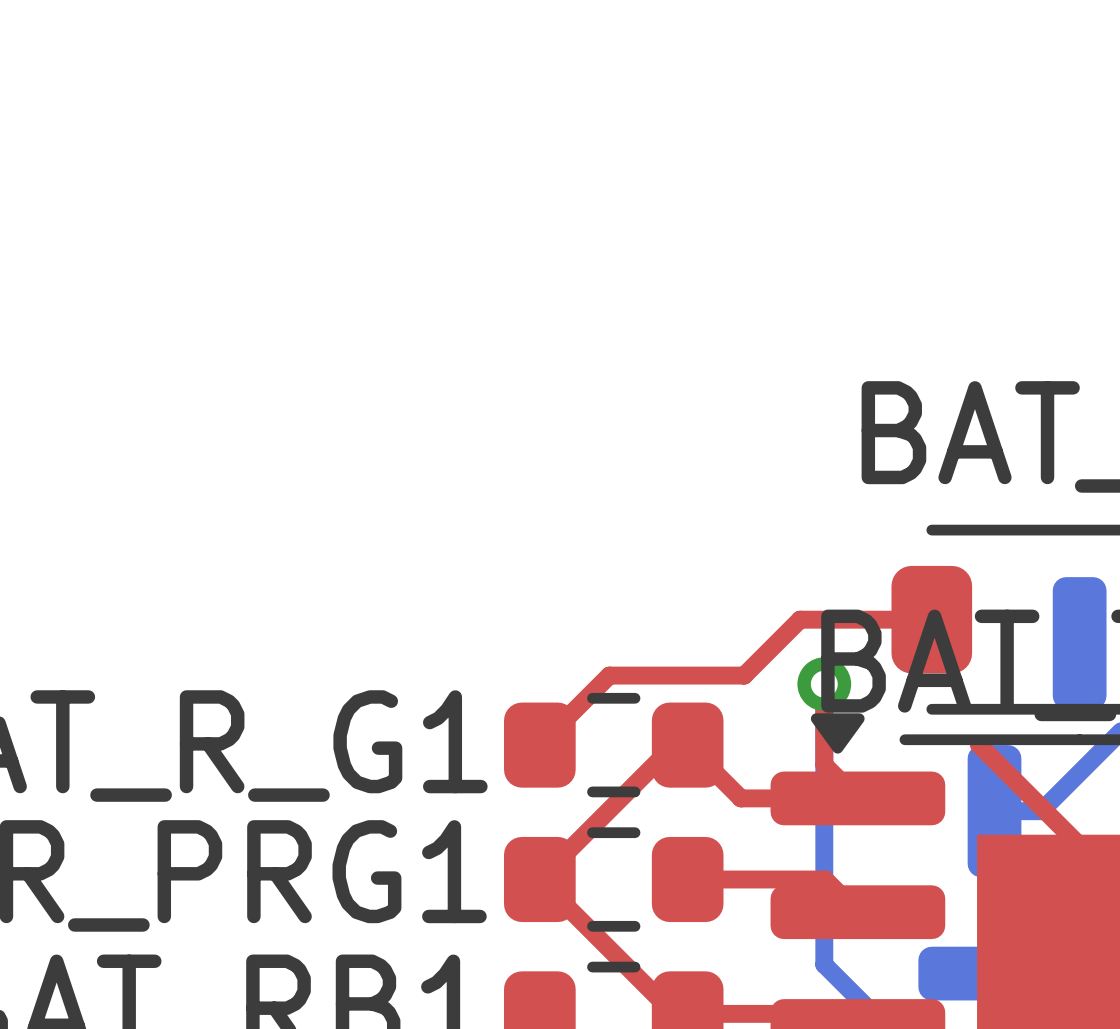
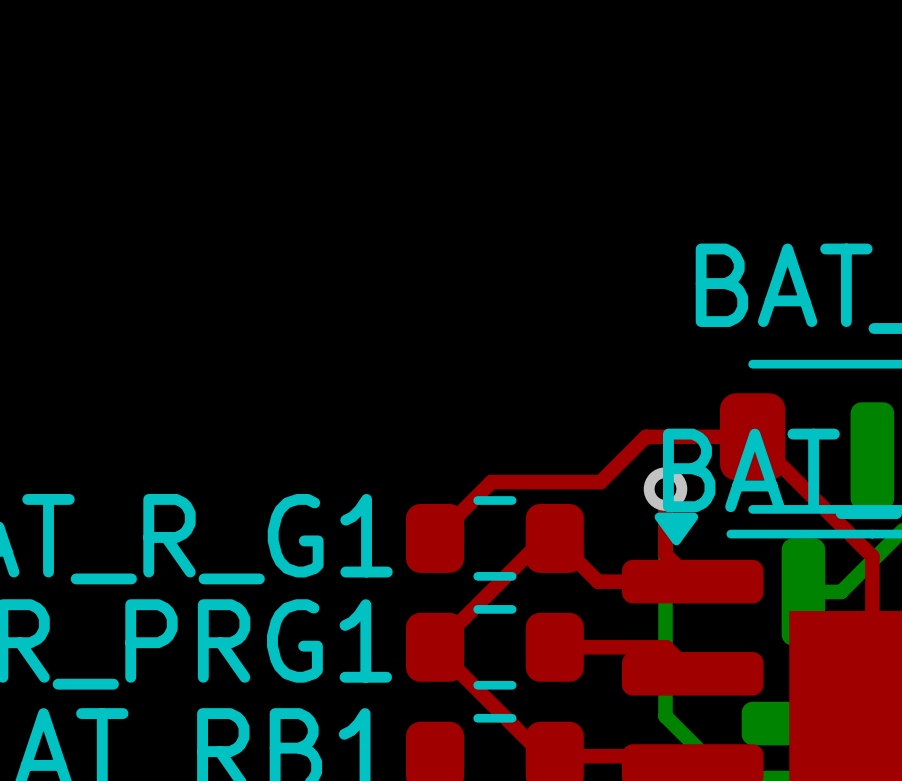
top track: (978, 744) (1079, 845) -> (752, 436) (872, 556) (872, 619)

